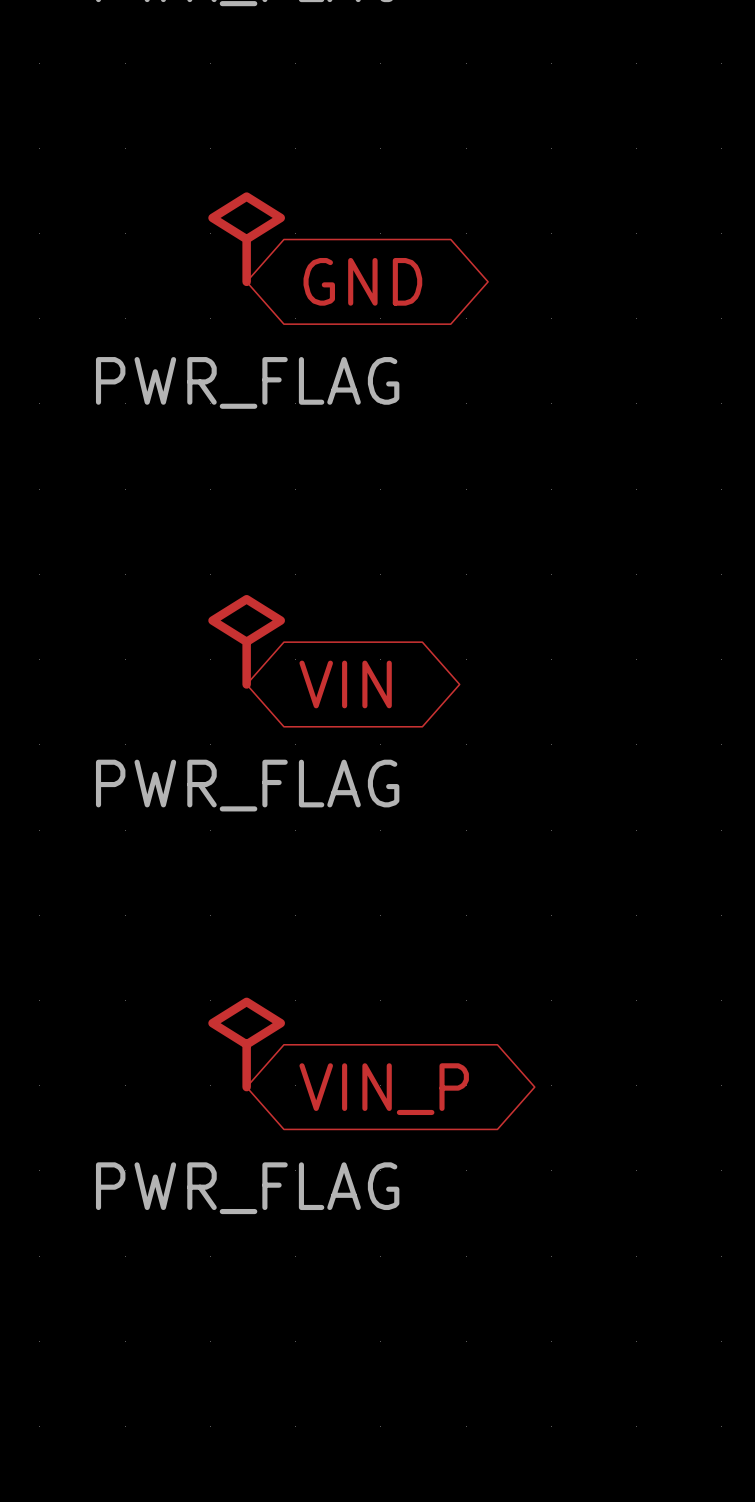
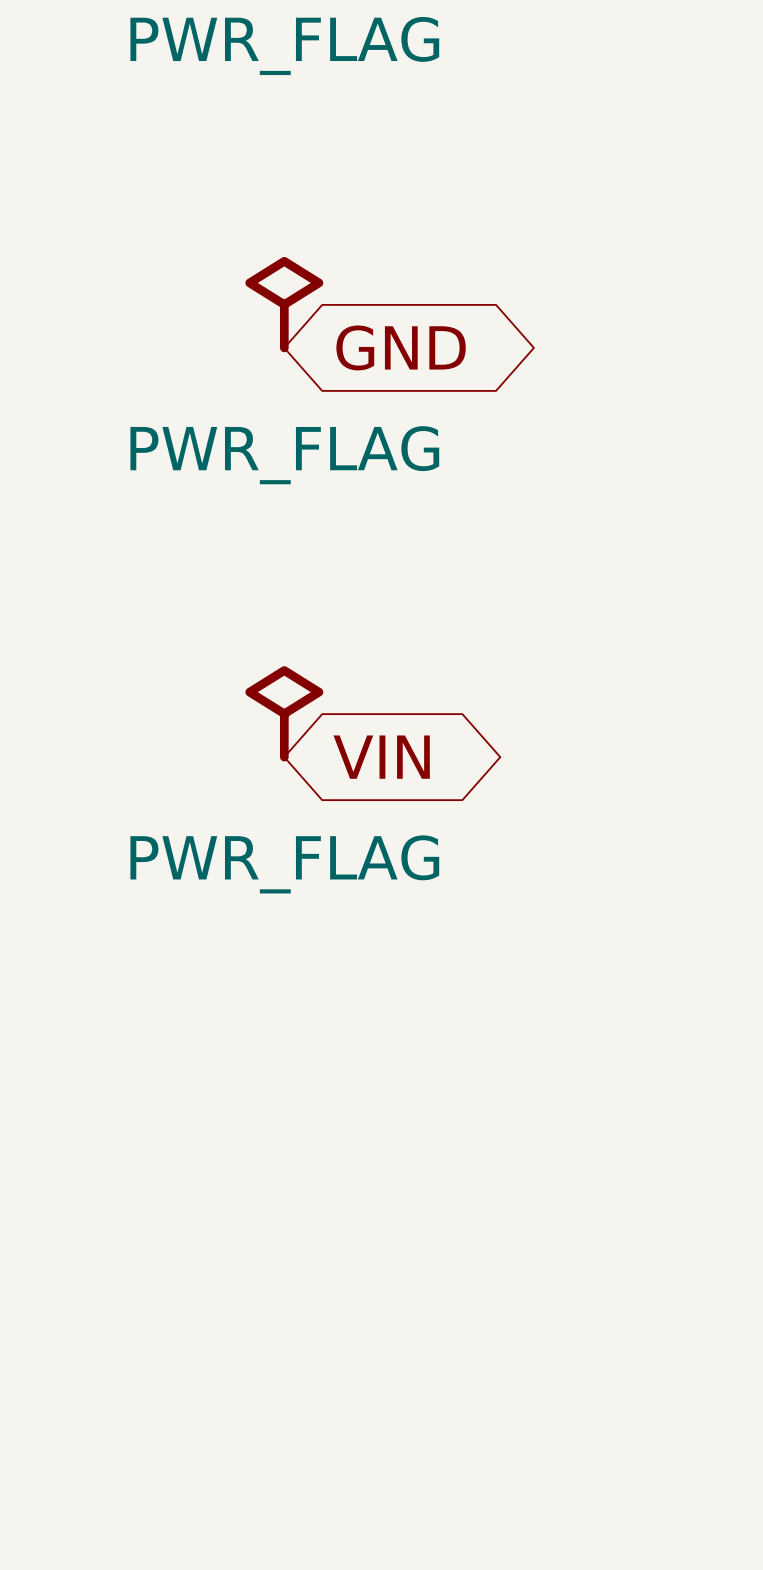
power symbol: PWR_FLAG (246, 1044) -> none
global label: VIN_P (384, 1089) -> none

